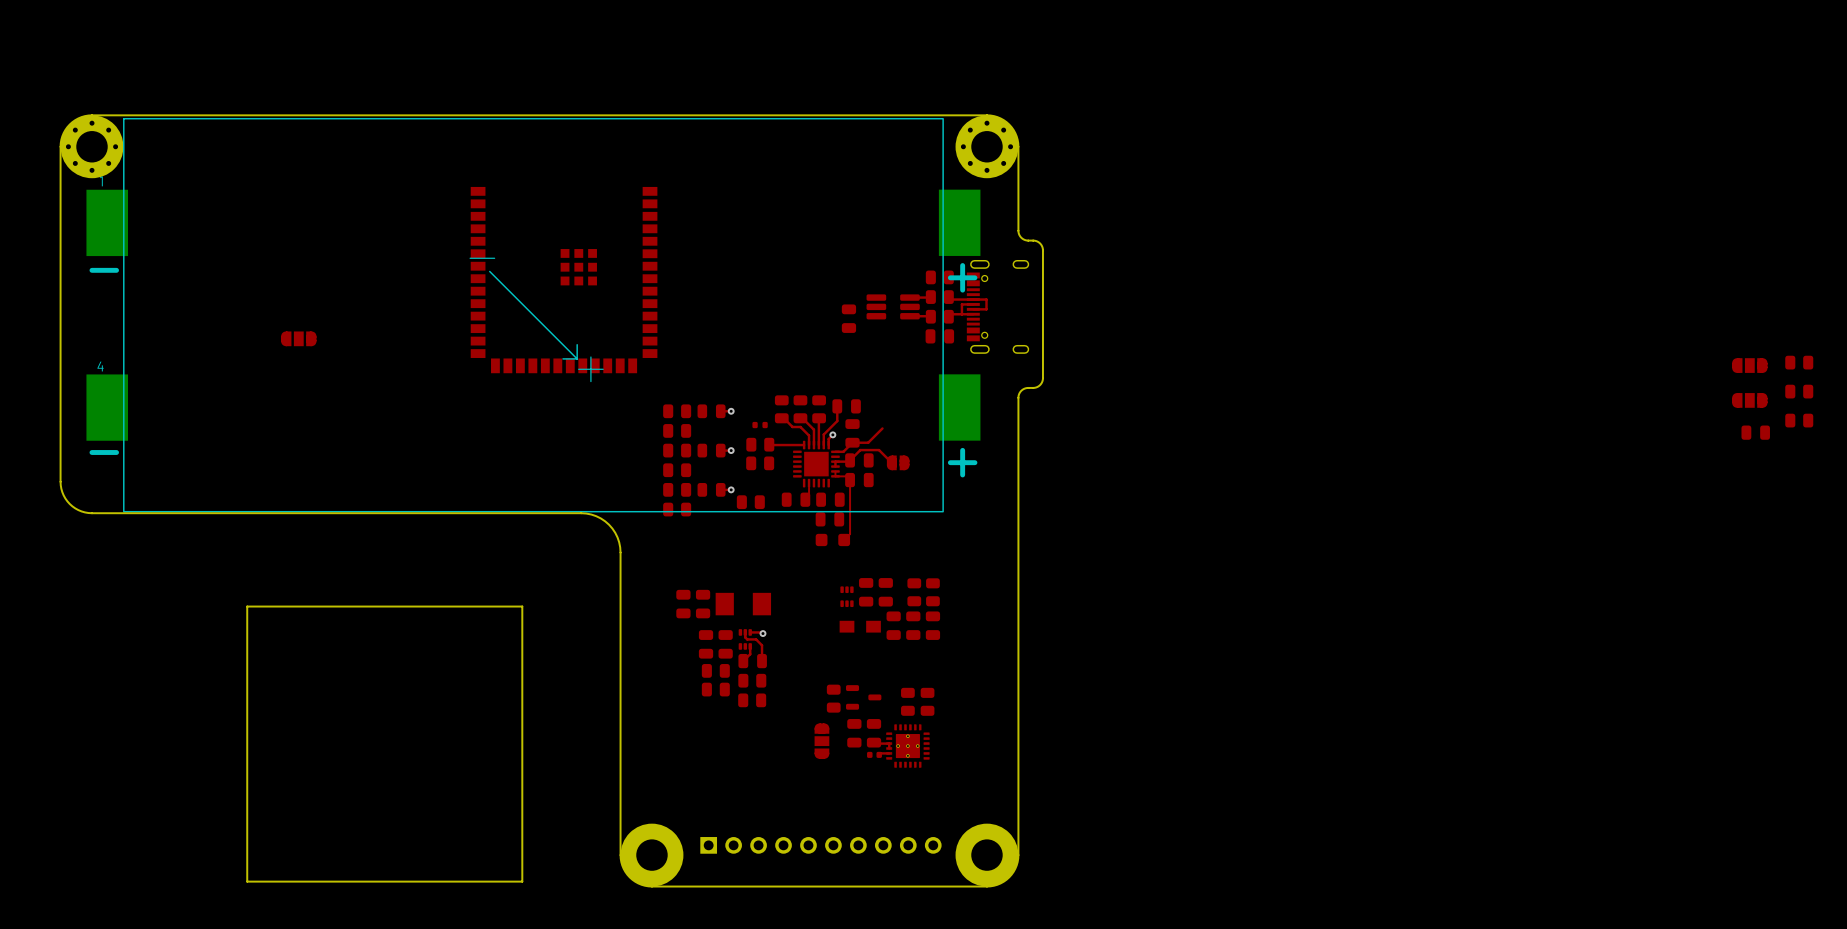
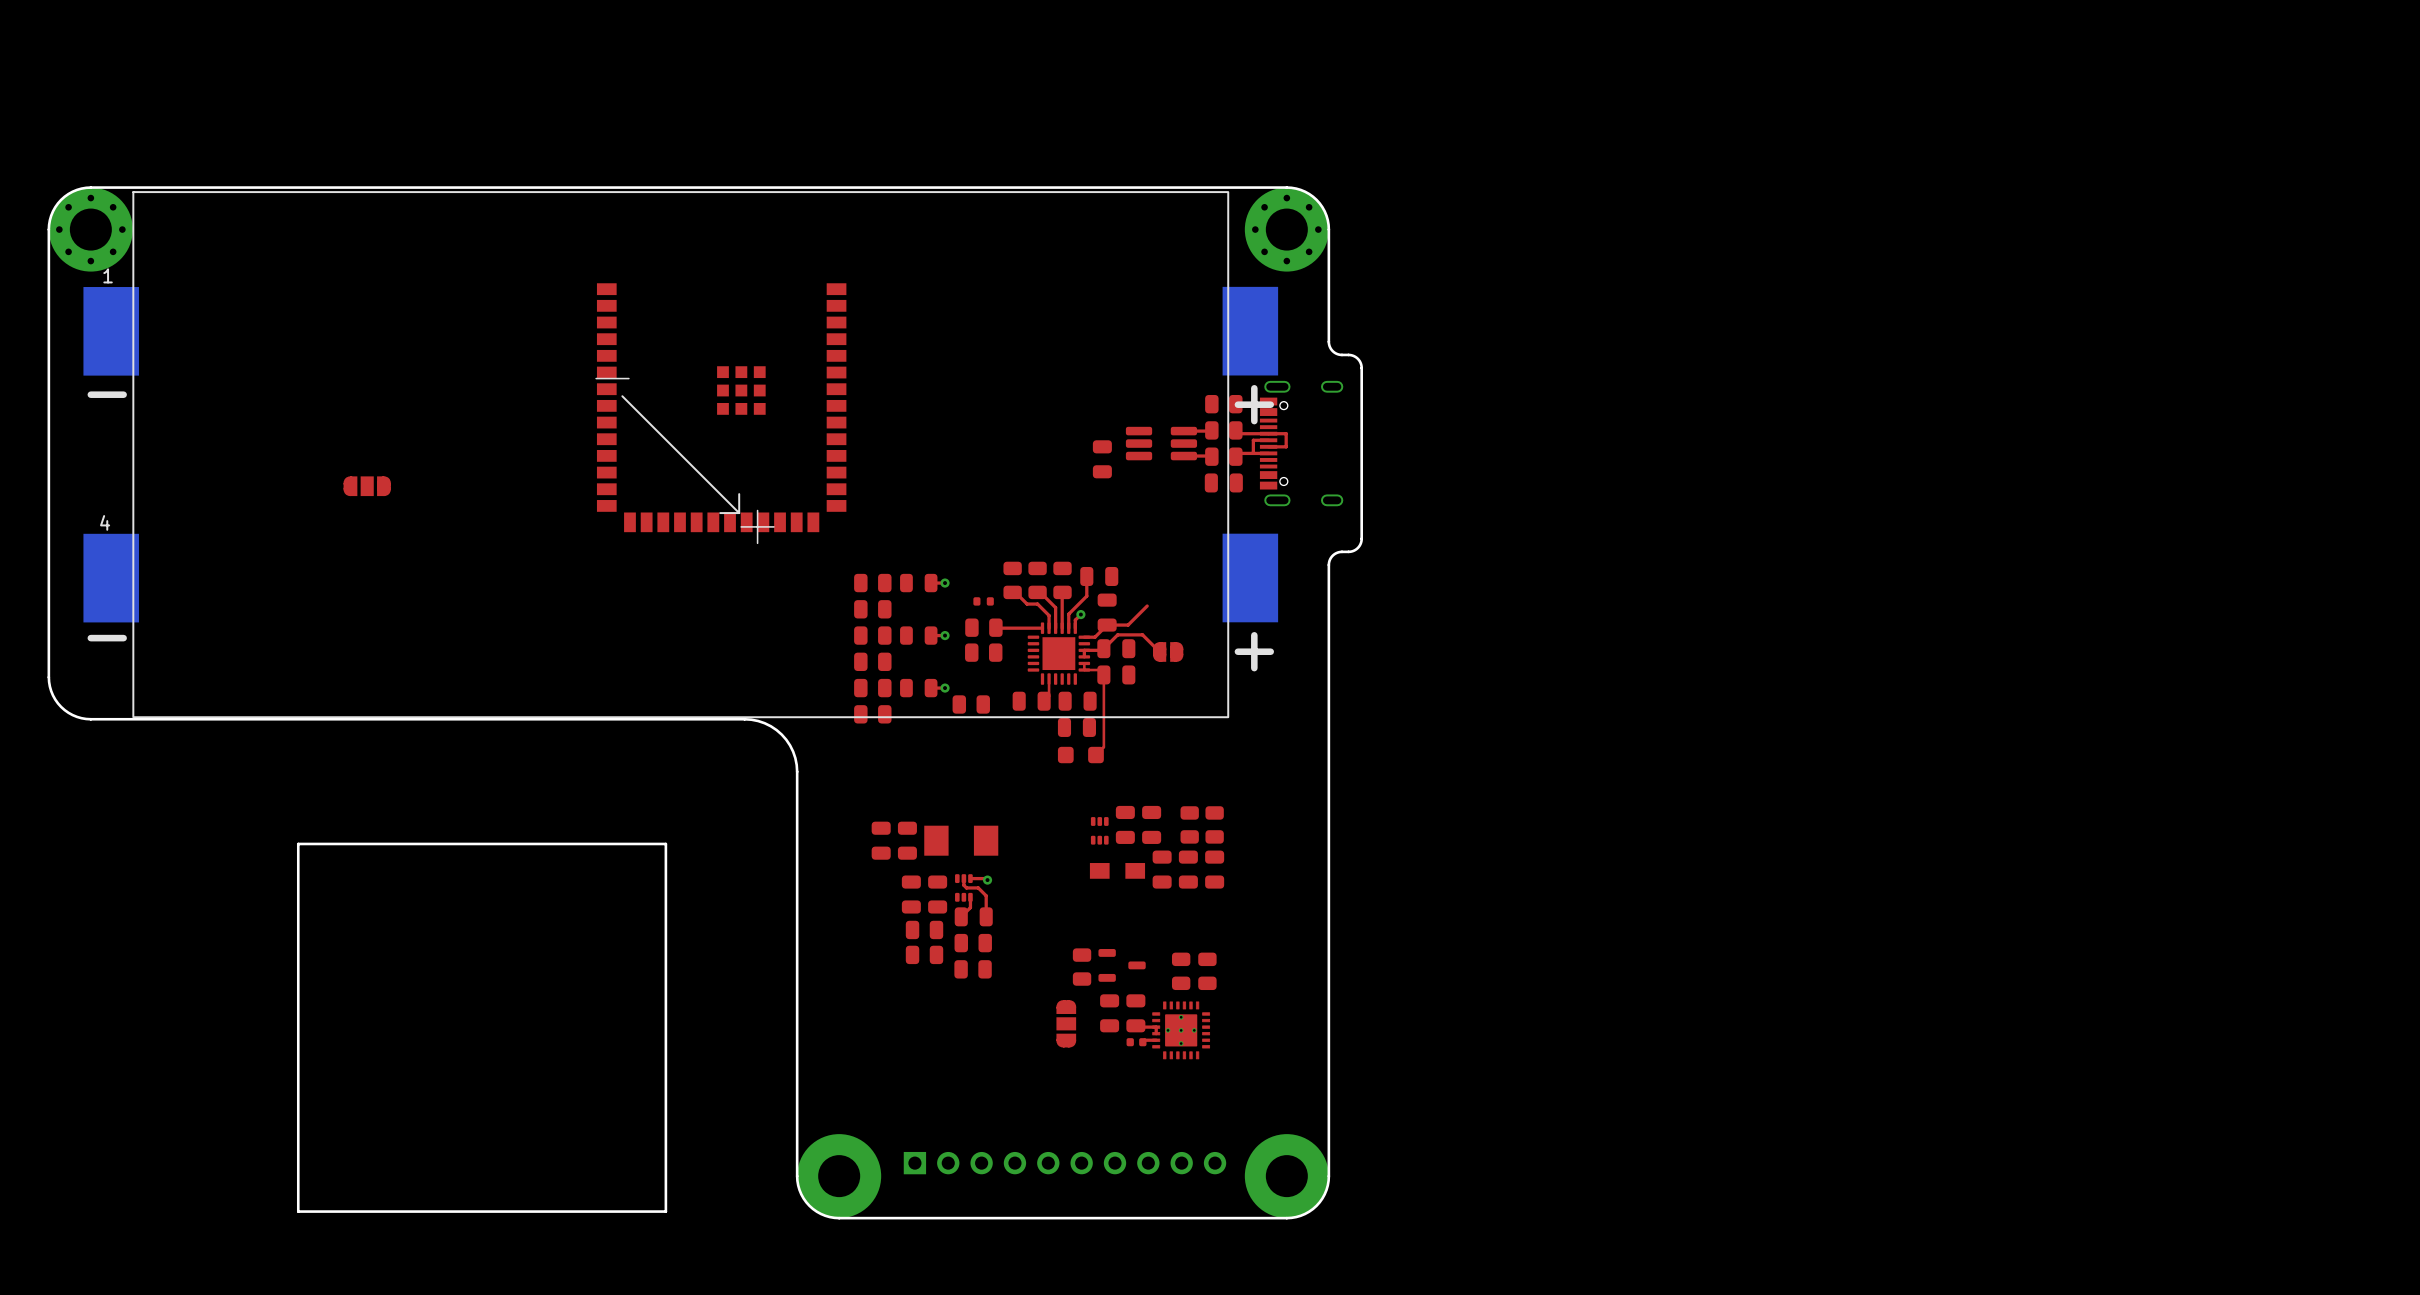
part: (1799, 362) -> none
part: (1749, 365) -> none
part: (1799, 391) -> none
part: (1749, 400) -> none
part: (1799, 420) -> none
part: (1755, 432) -> none

